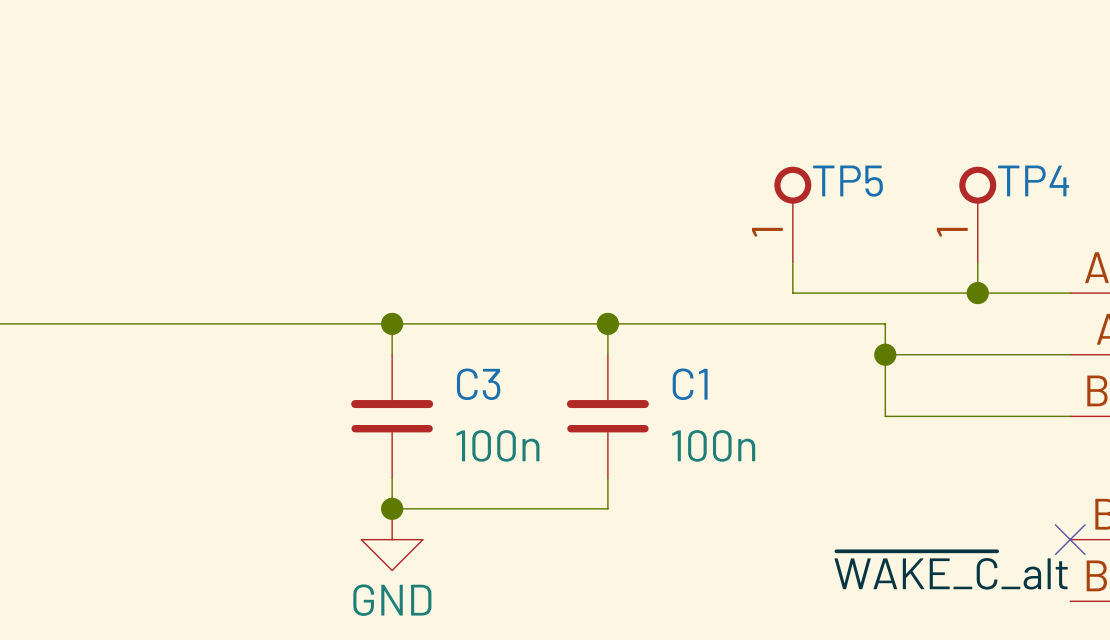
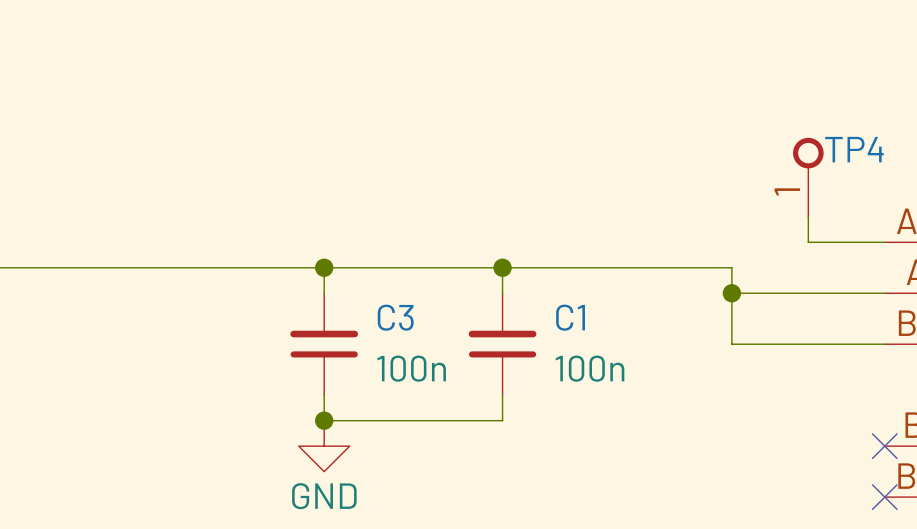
TP5: (792, 214) -> none
wire: (792, 262) (792, 293) (977, 293) -> none
junction: (977, 293) -> none
label: ~{WAKE_C}_alt (951, 570) -> none
no-connect mark: none -> (884, 497)

